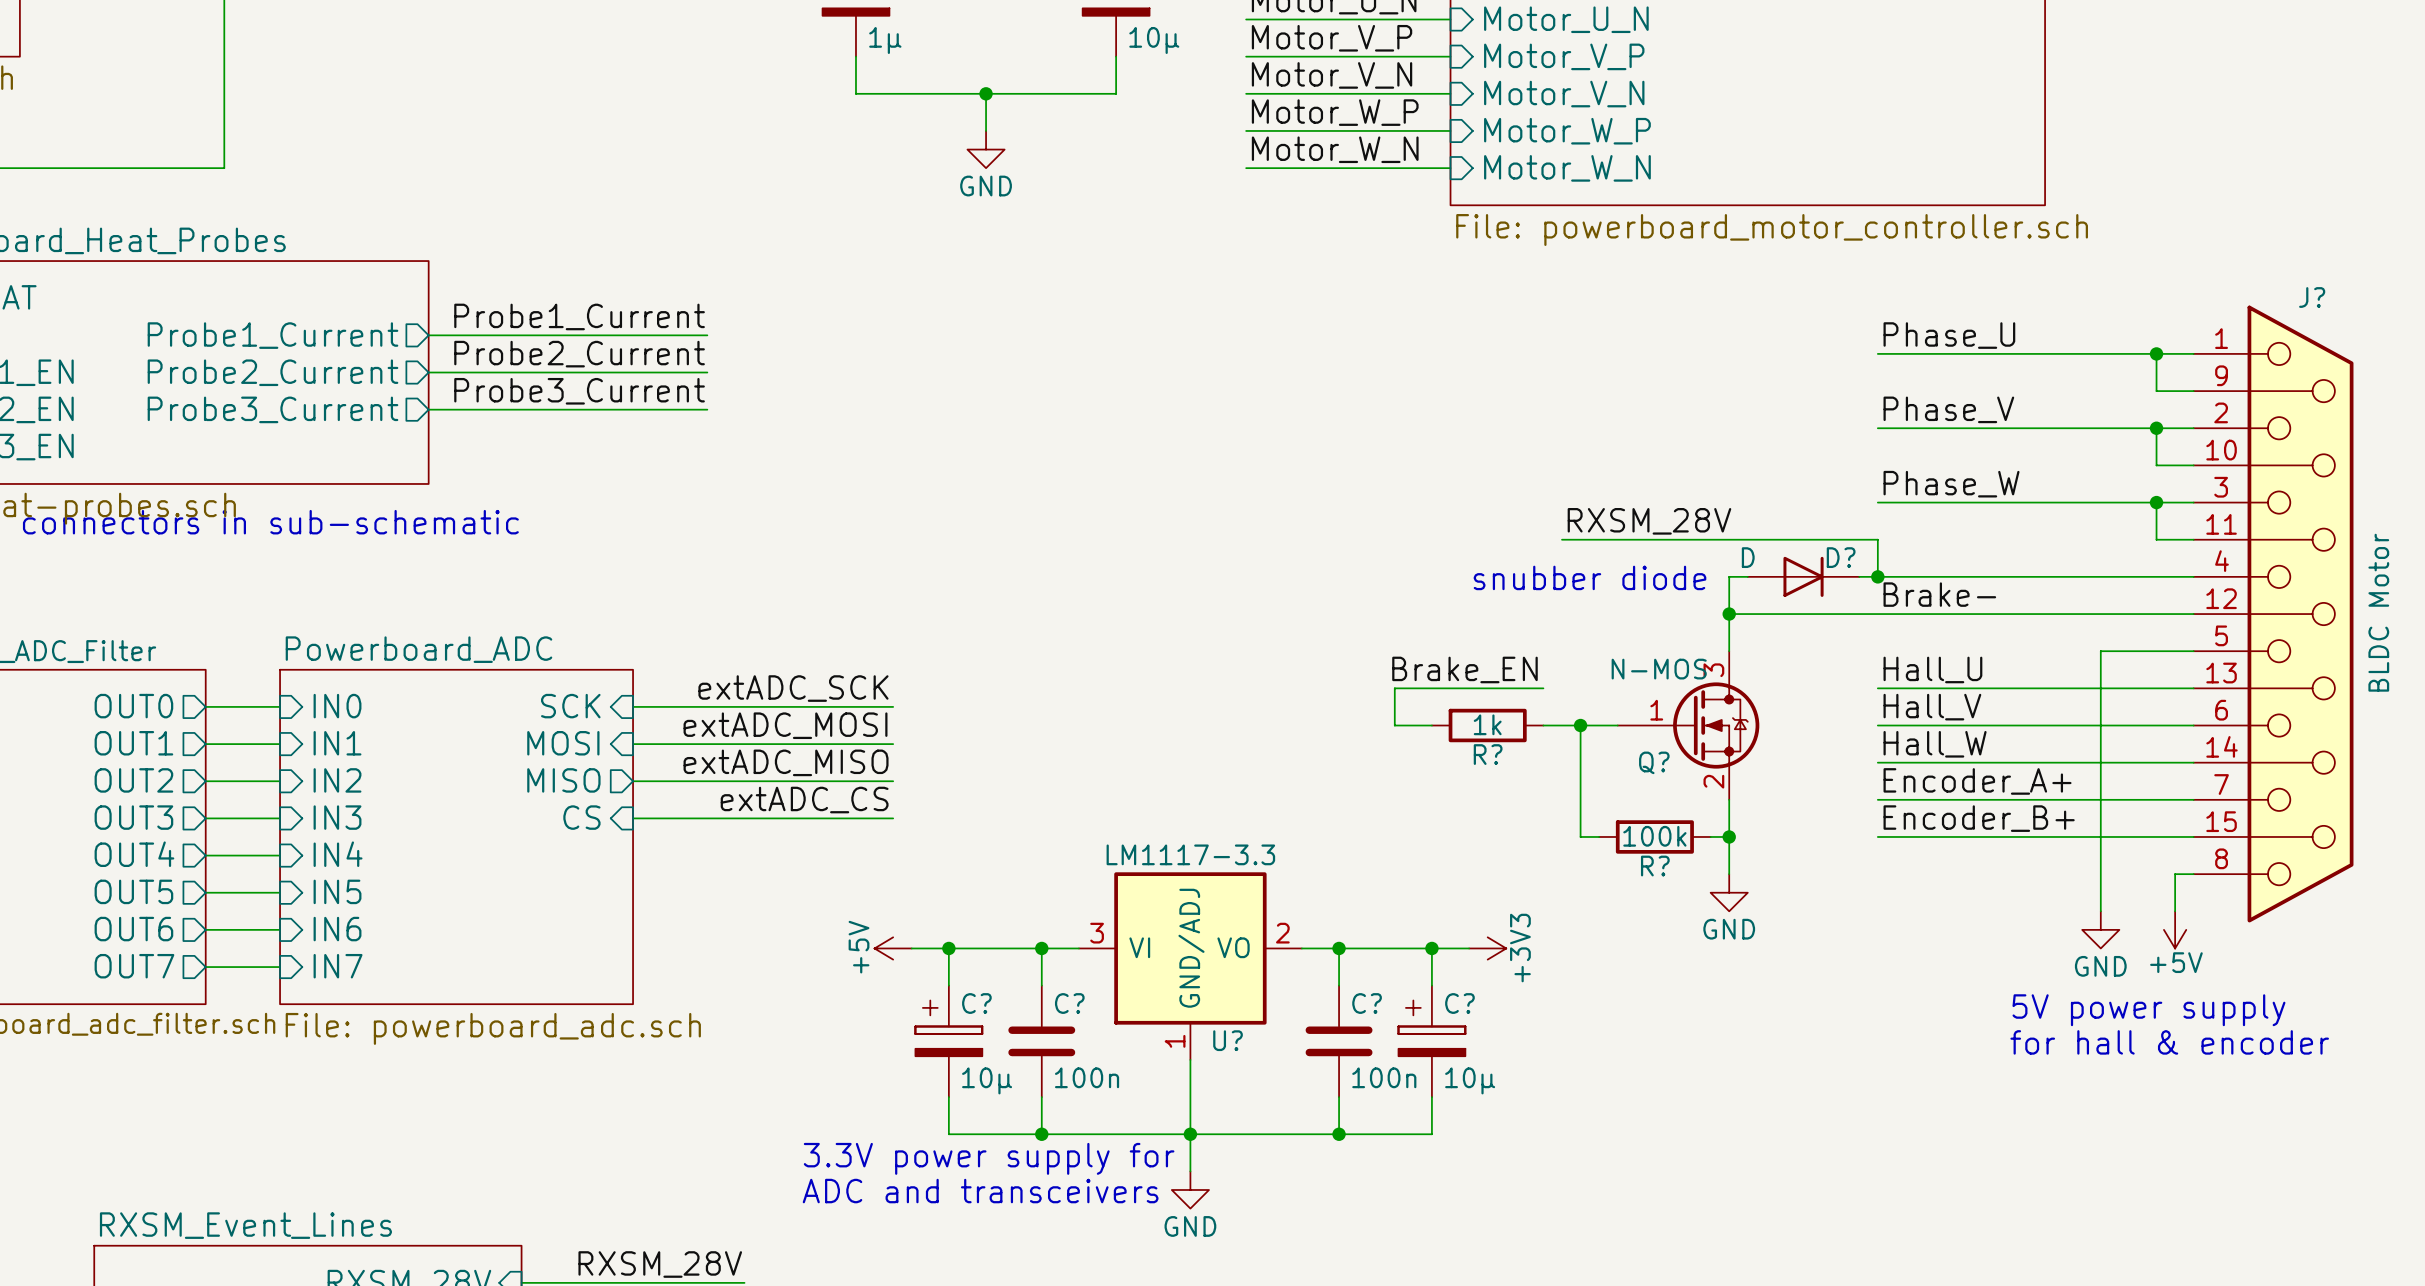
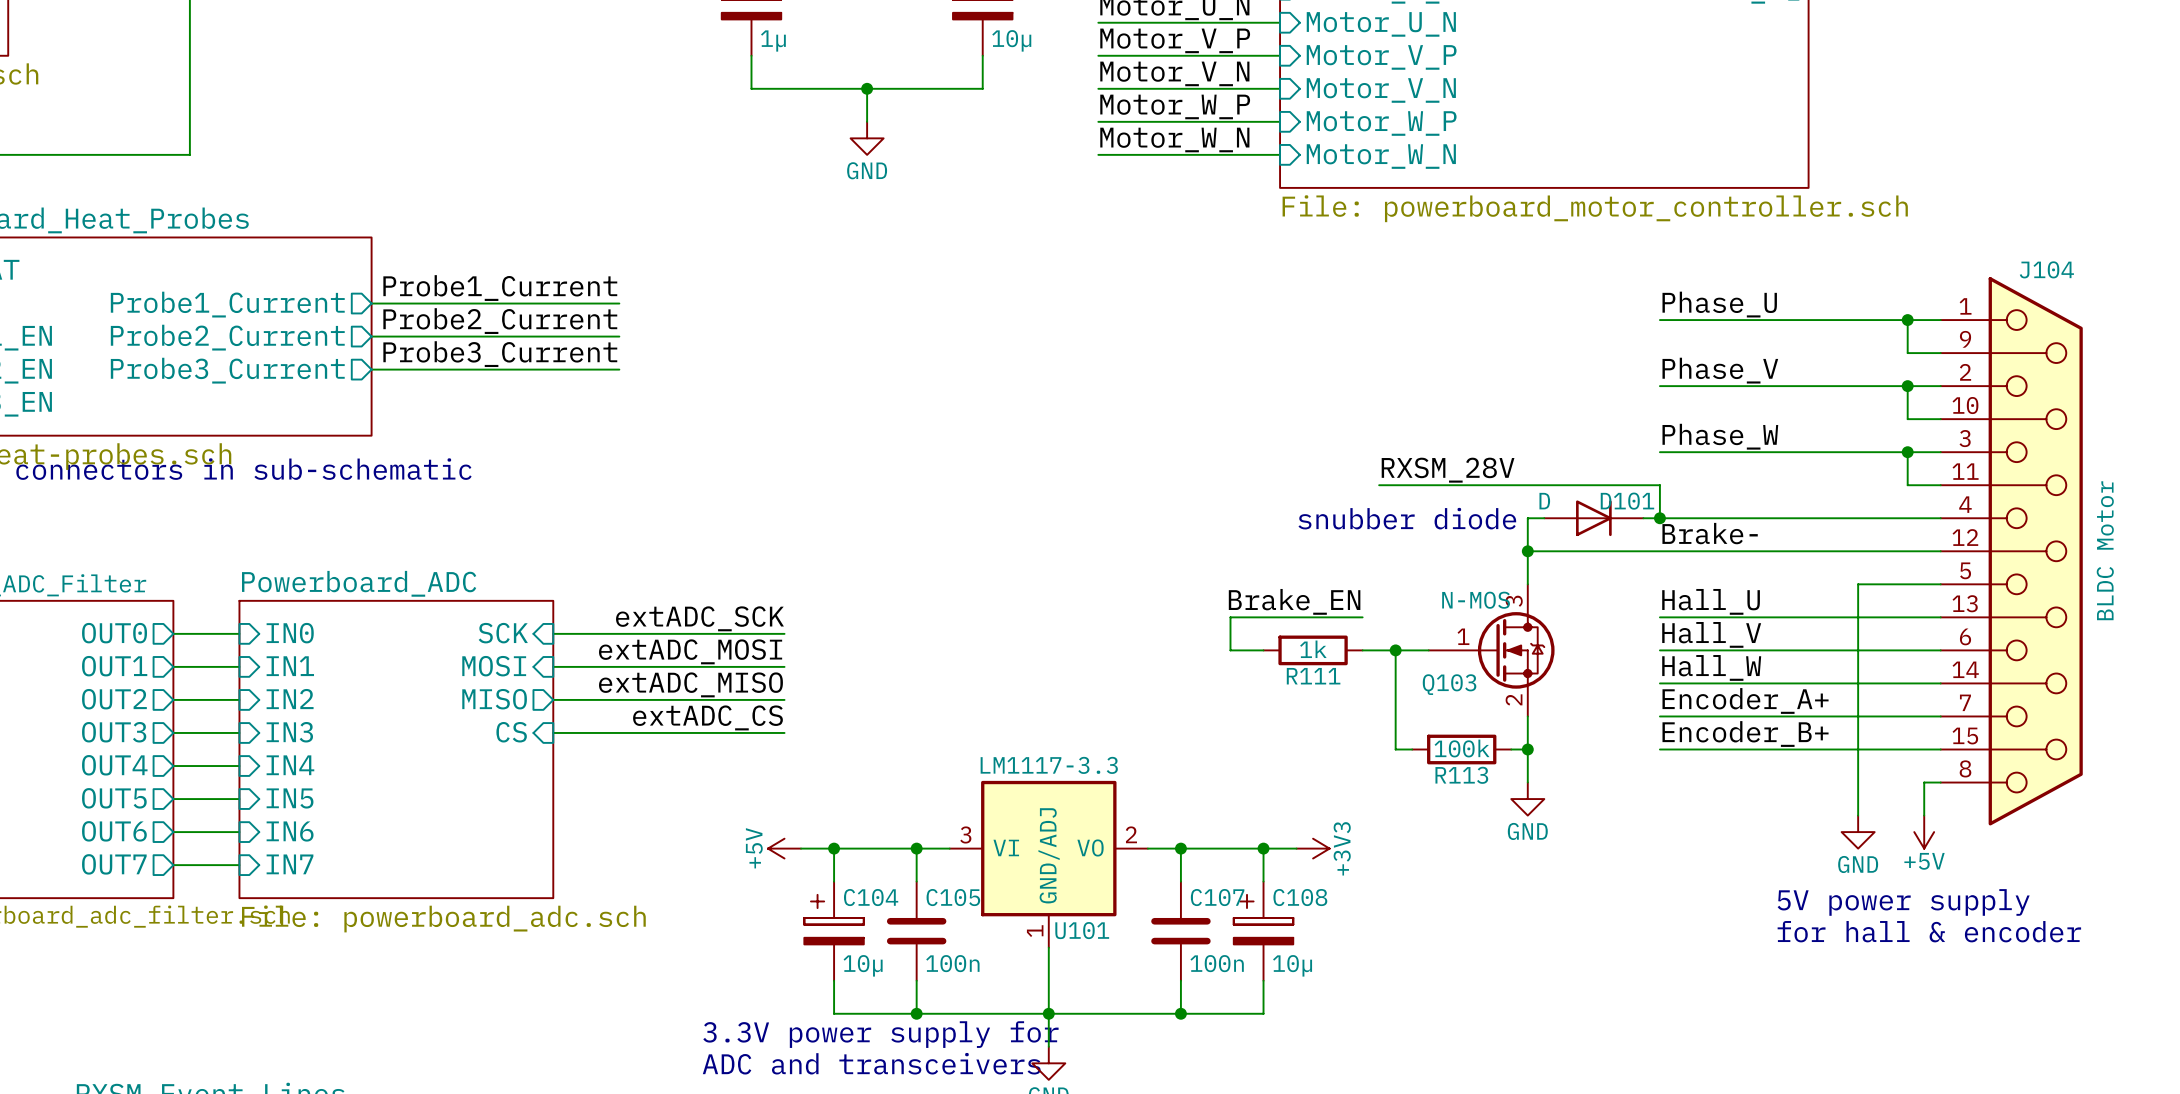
J? name: J? (2312, 297) -> J104 (2046, 269)
D? name: D? (1841, 557) -> D101 (1627, 501)
R? name: R? (1488, 754) -> R111 (1313, 676)
Q? name: Q? (1654, 762) -> Q103 (1449, 684)
R? name: R? (1655, 866) -> R113 (1461, 775)
C? name: C? (976, 1003) -> C104 (871, 897)
C? name: C? (1069, 1003) -> C105 (953, 897)
C? name: C? (1367, 1003) -> C107 (1217, 897)
C? name: C? (1459, 1003) -> C108 (1300, 897)
U? name: U? (1228, 1040) -> U101 (1082, 930)

